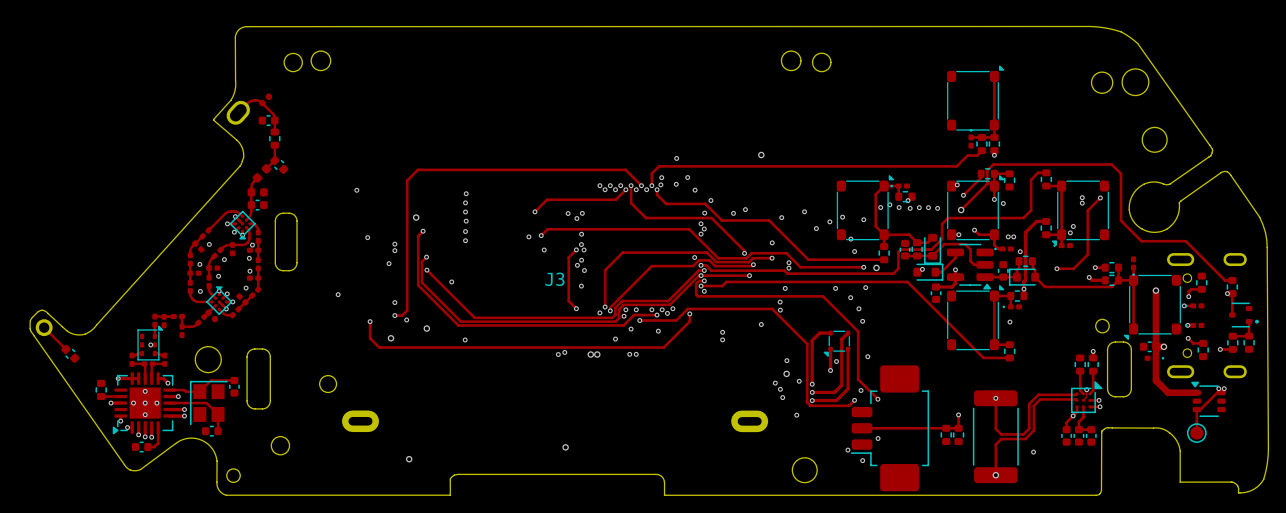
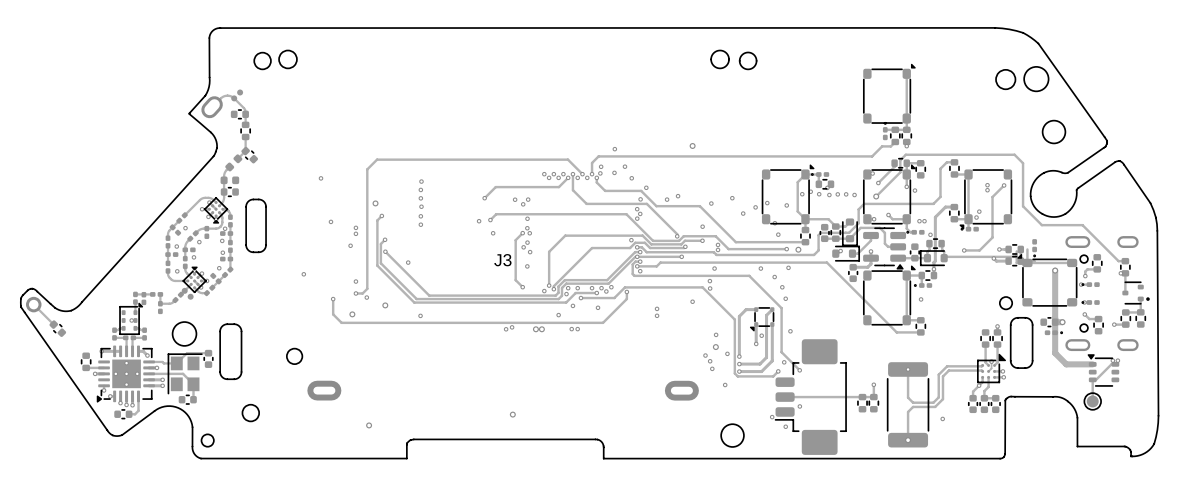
track: none -> (1027, 249) (1027, 262)
track: (1133, 267) (1133, 329) -> none
track: none -> (1016, 251) (1016, 262) (1072, 262)
track: none -> (945, 256) (1016, 256)
track: (1035, 277) (1044, 286) (1111, 286) (1118, 280) -> none
part rotation: 0° (1152, 307) -> 90° clockwise (1047, 280)

